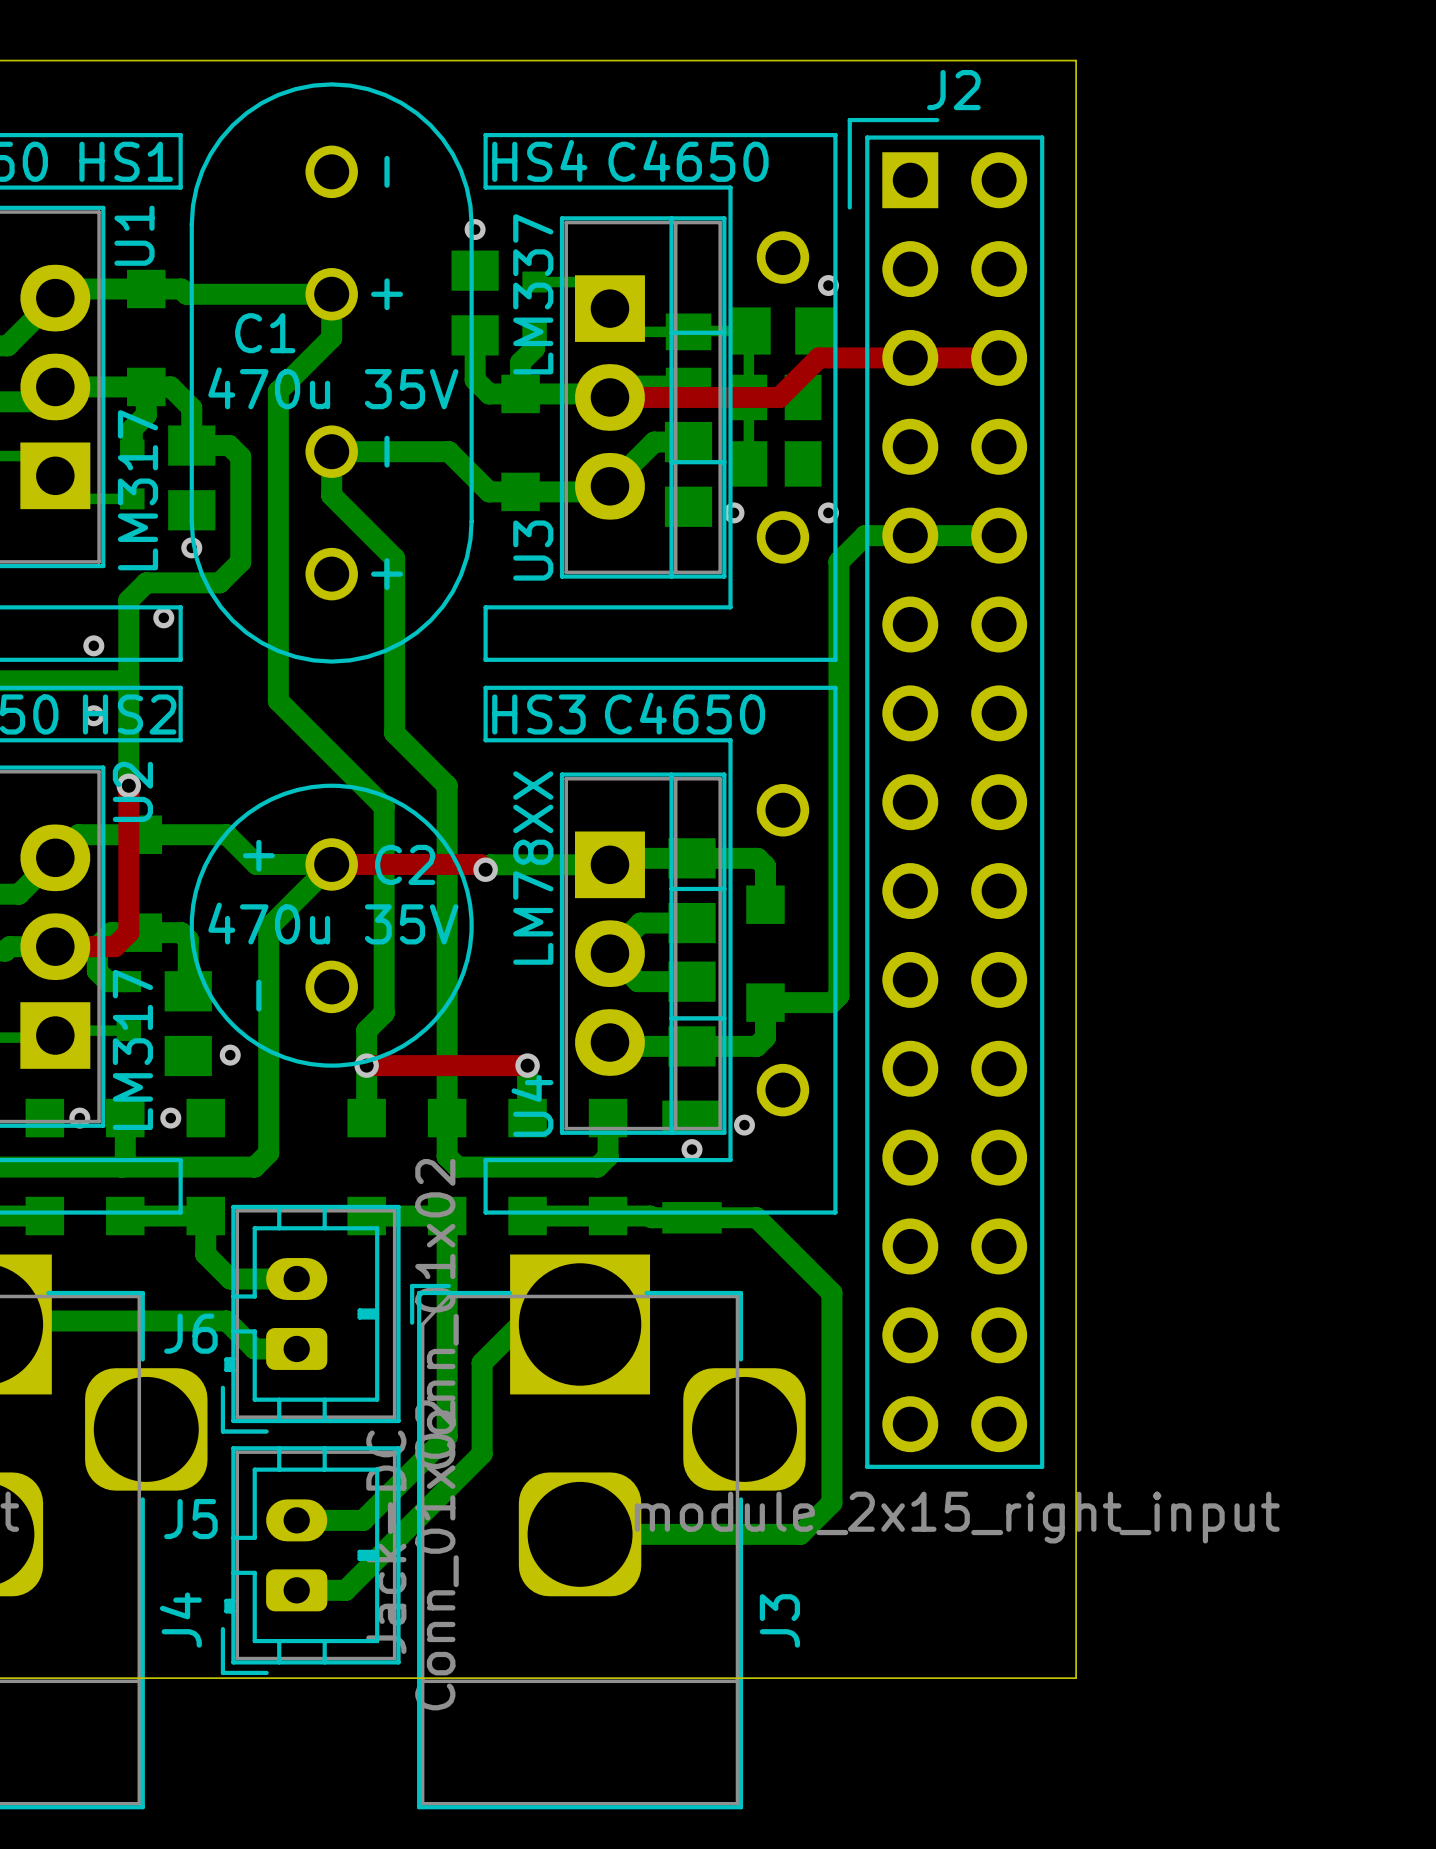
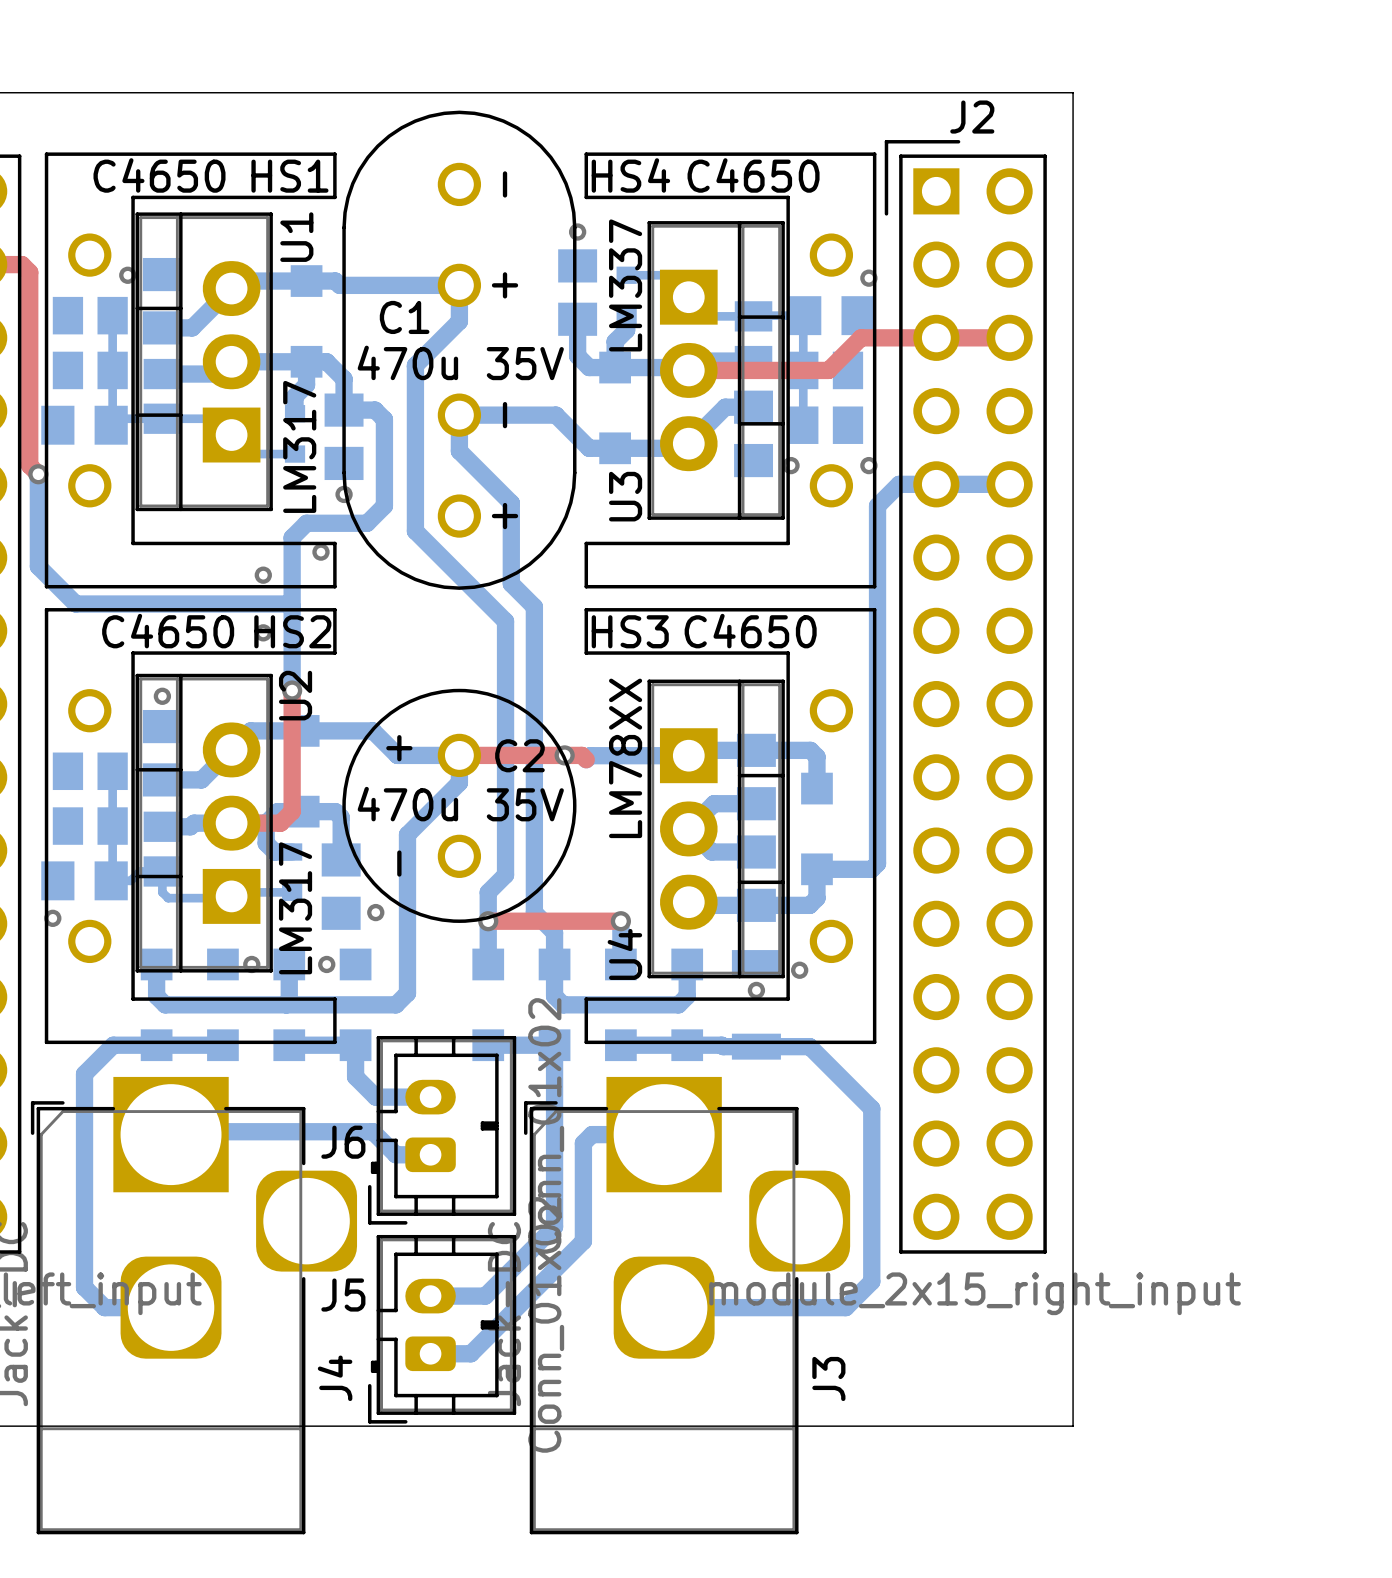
bottom track: (278, 592) (278, 700) (384, 806) (384, 1013) -> (415, 531) (505, 621) (505, 875) (502, 877)
bottom track: (394, 656) (394, 733) (447, 785) (447, 1079) -> (511, 583) (534, 606) (534, 912) (554, 932)
bottom track: (331, 864) (268, 927) (268, 960) -> (459, 755) (459, 782) (407, 834)
via position: (485, 869) -> (564, 755)
bottom track: (520, 1324) (482, 1362) -> (615, 1134) (592, 1134) (583, 1143) (583, 1166)

